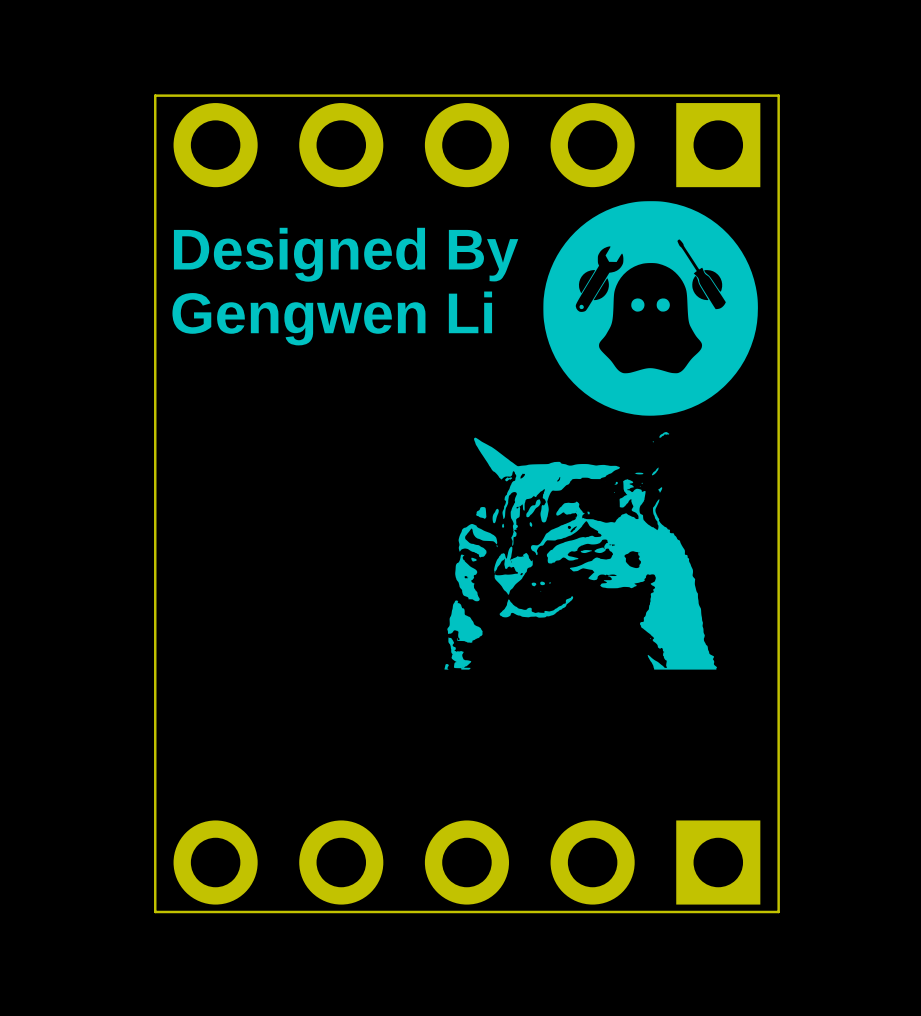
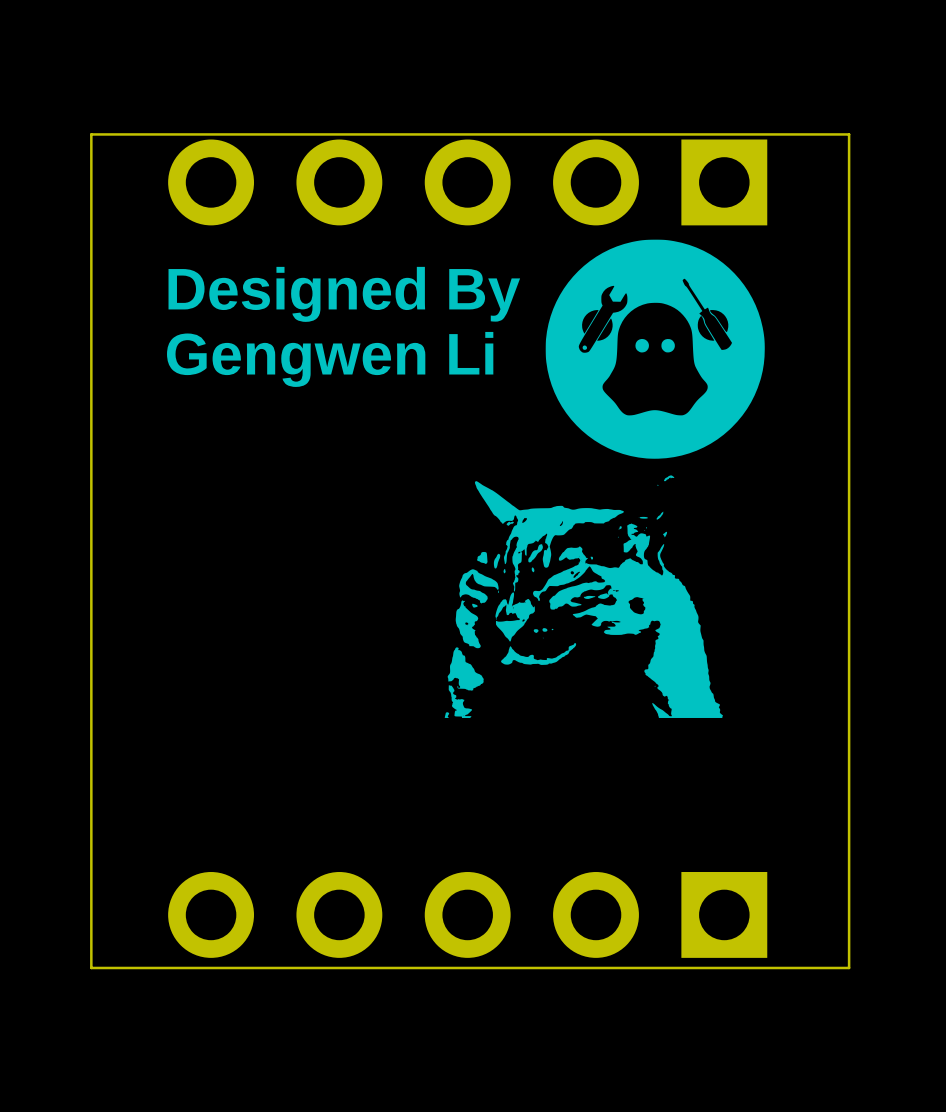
board edge: (778, 95) (155, 95) (155, 911) (778, 911) (778, 95) -> (849, 134) (849, 967) (91, 967) (91, 134) (849, 134)

